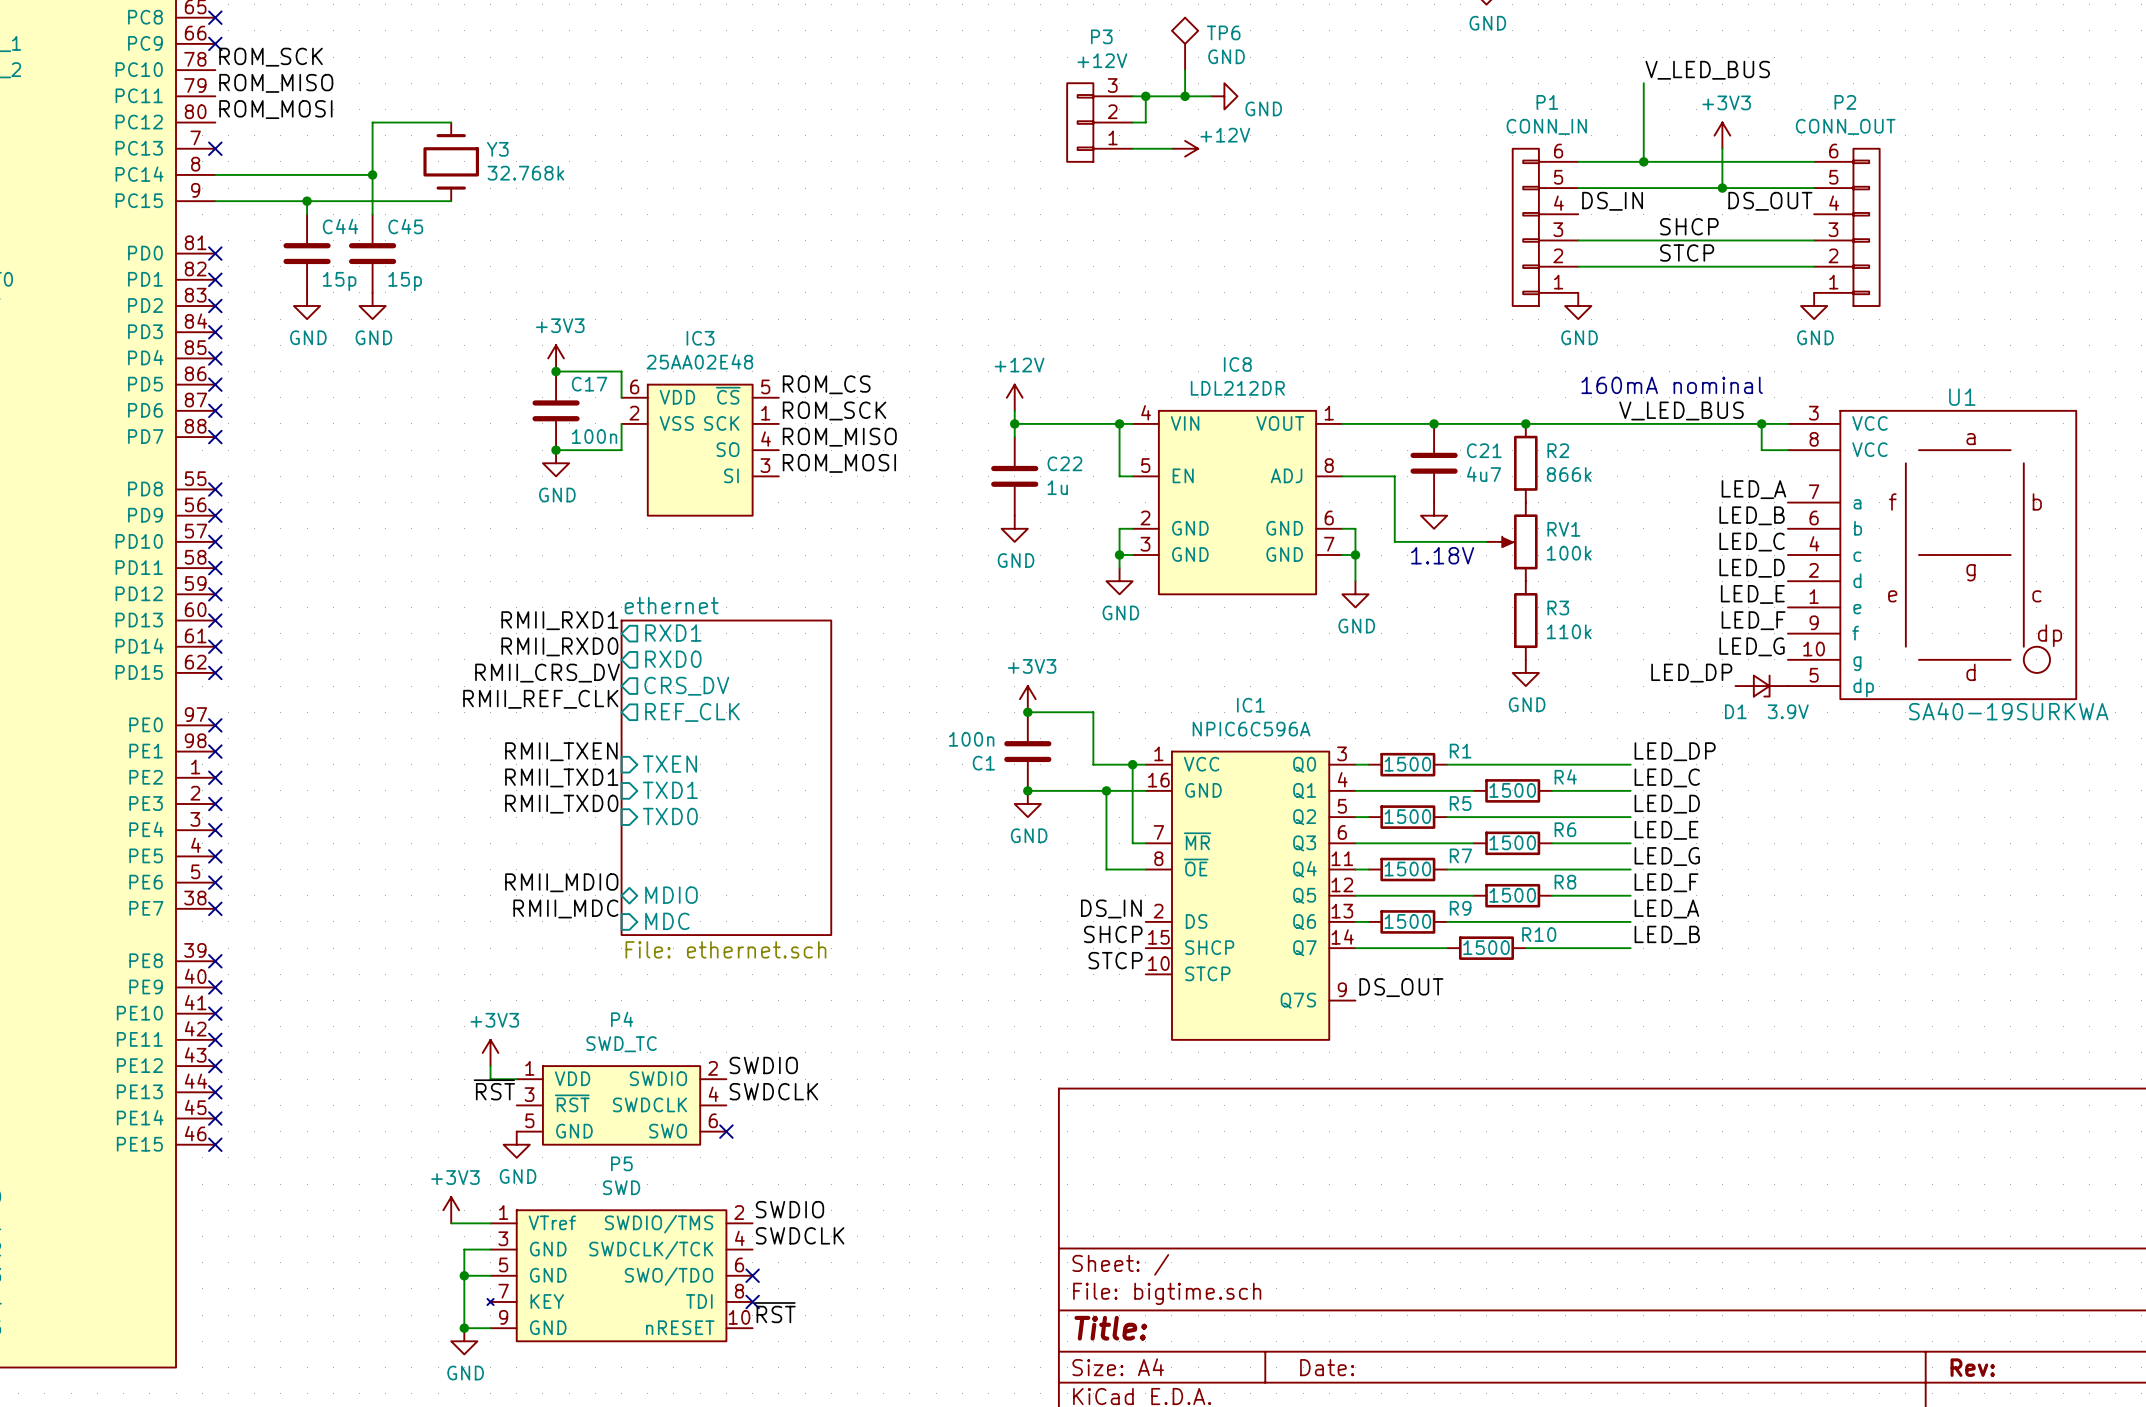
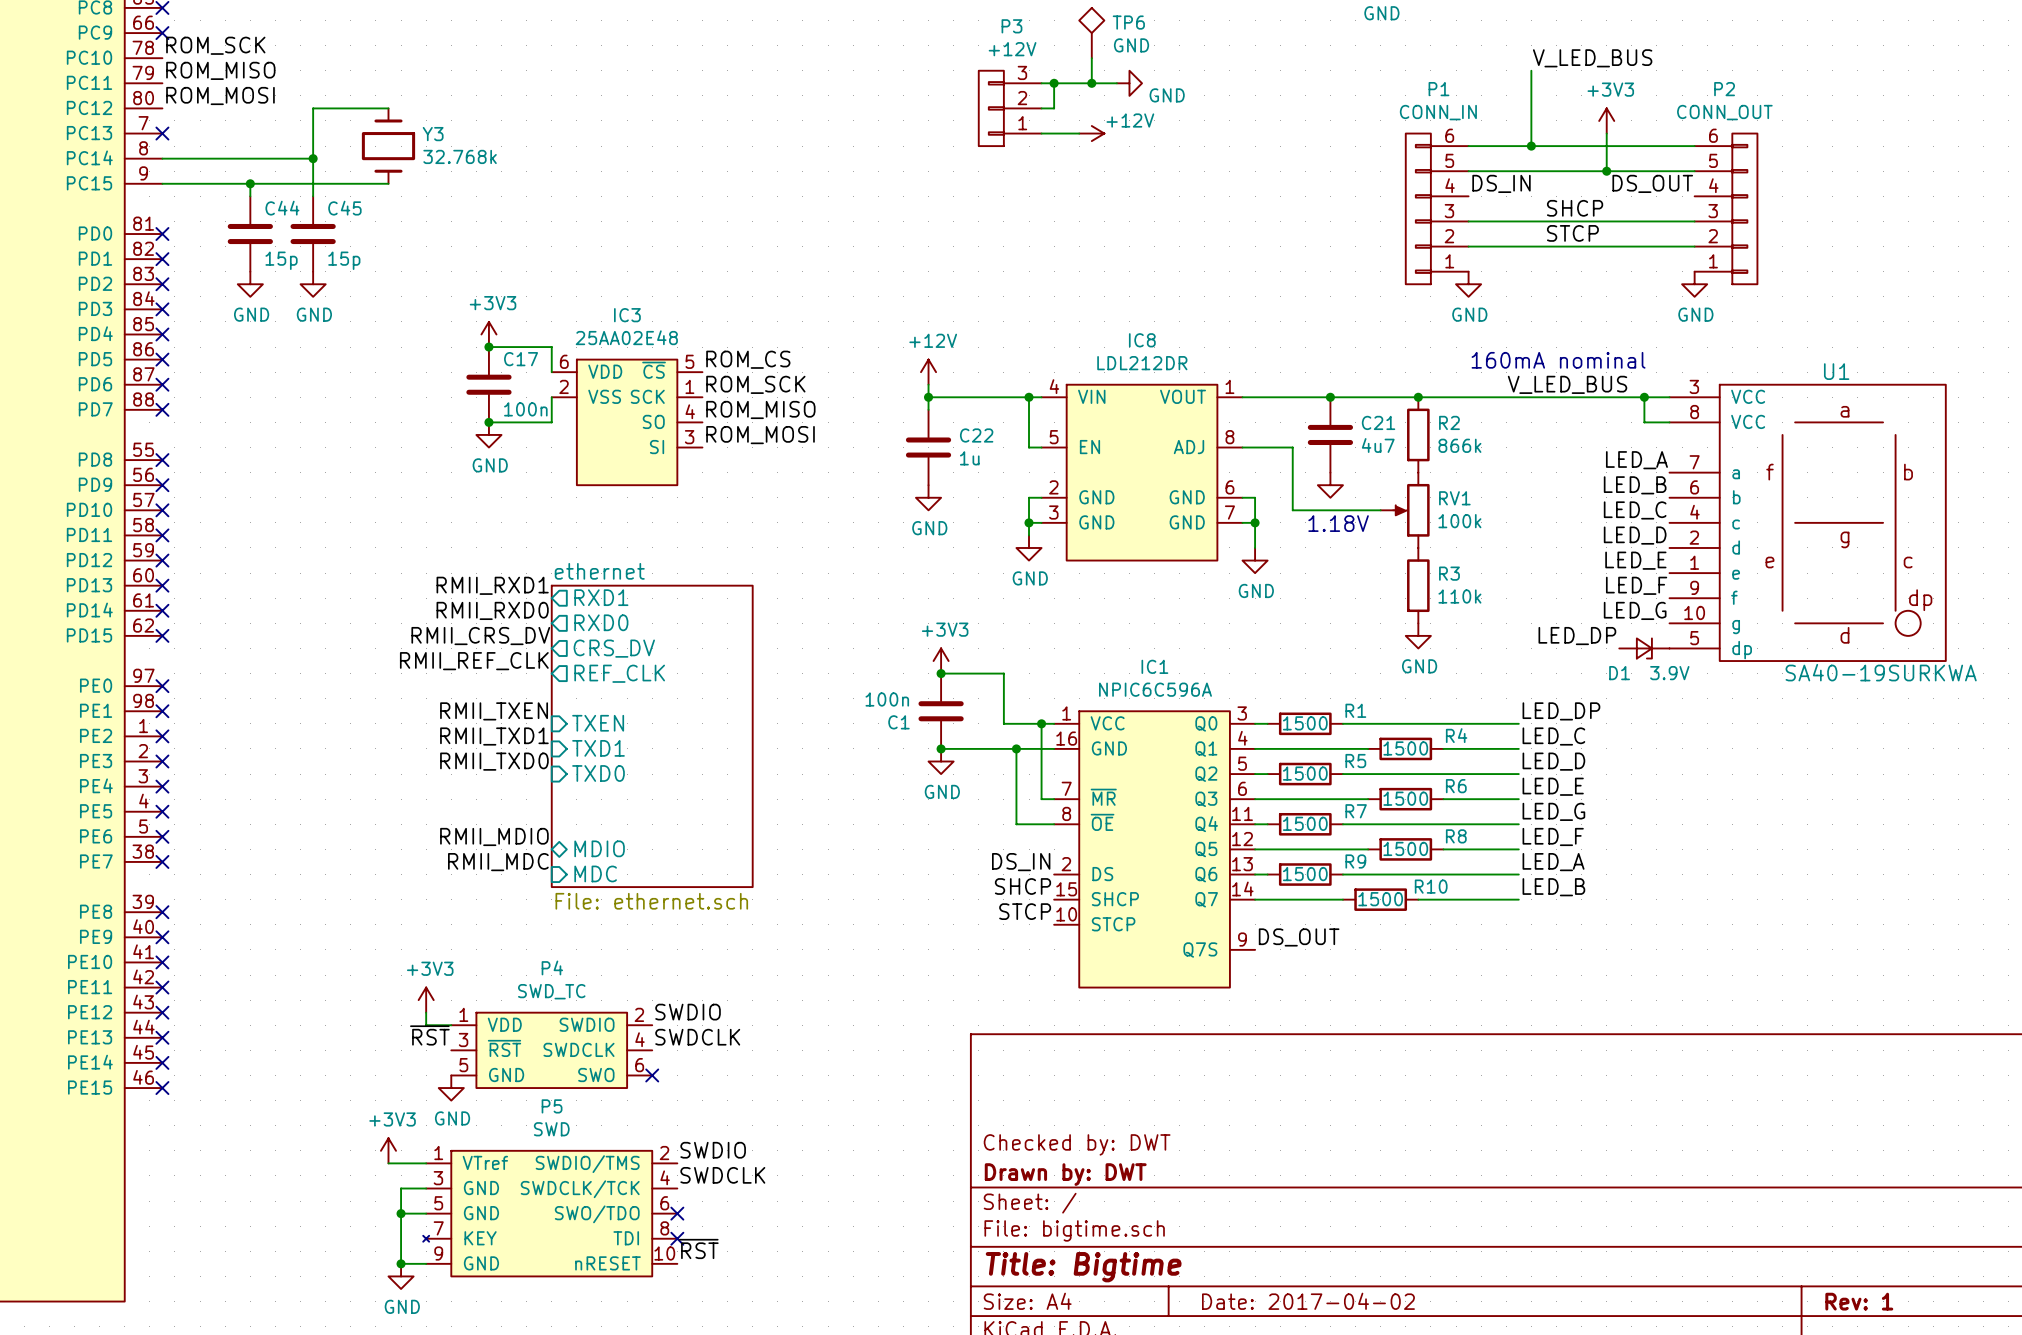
title block: none -> Checked by: DWT (1077, 1144)
title block: none -> Drawn by: DWT (1065, 1174)
title block: Title: (1110, 1328) -> Title: Bigtime (1083, 1267)
title block: Date: (1327, 1367) -> Date: 2017-04-02 (1308, 1301)
title block: Rev: (1972, 1367) -> Rev: 1 (1859, 1301)

